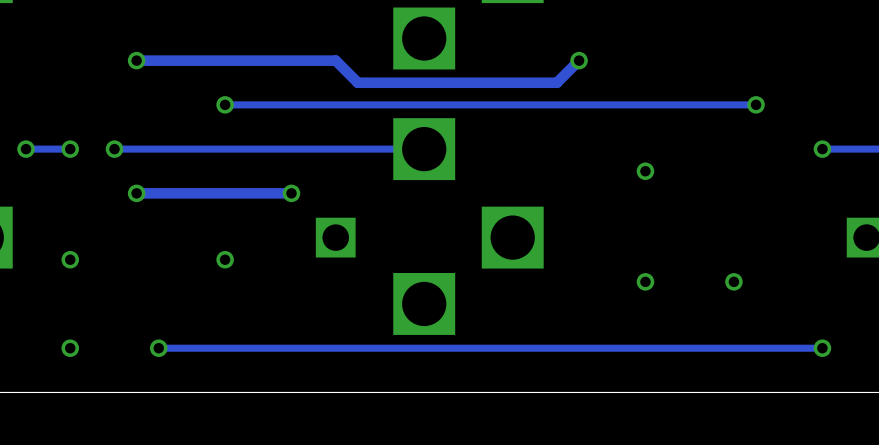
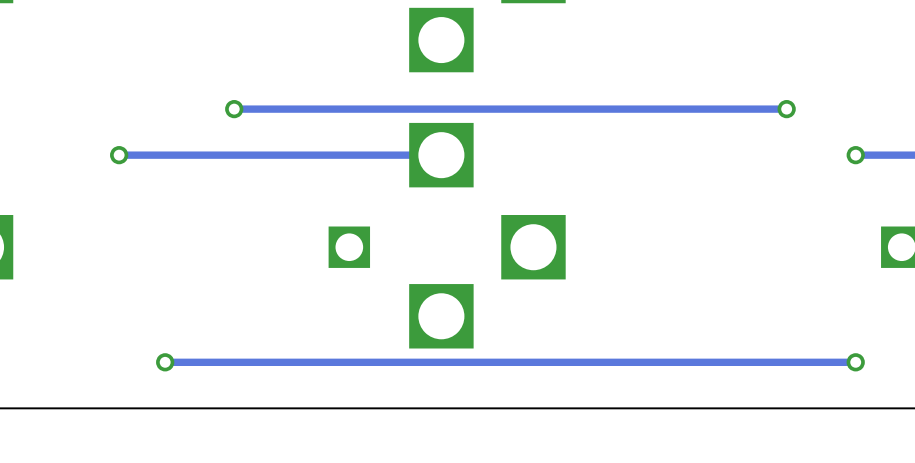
via: (136, 60) -> none
track: (579, 60) (556, 82) (357, 82) (335, 60) (136, 60) -> none
via: (579, 60) -> none
via: (26, 149) -> none
track: (70, 149) (26, 149) -> none
via: (70, 149) -> none
via: (645, 171) -> none
via: (136, 193) -> none
track: (291, 193) (136, 193) -> none
via: (291, 193) -> none
via: (70, 259) -> none
via: (225, 259) -> none
via: (645, 281) -> none
via: (733, 281) -> none
via: (70, 348) -> none

